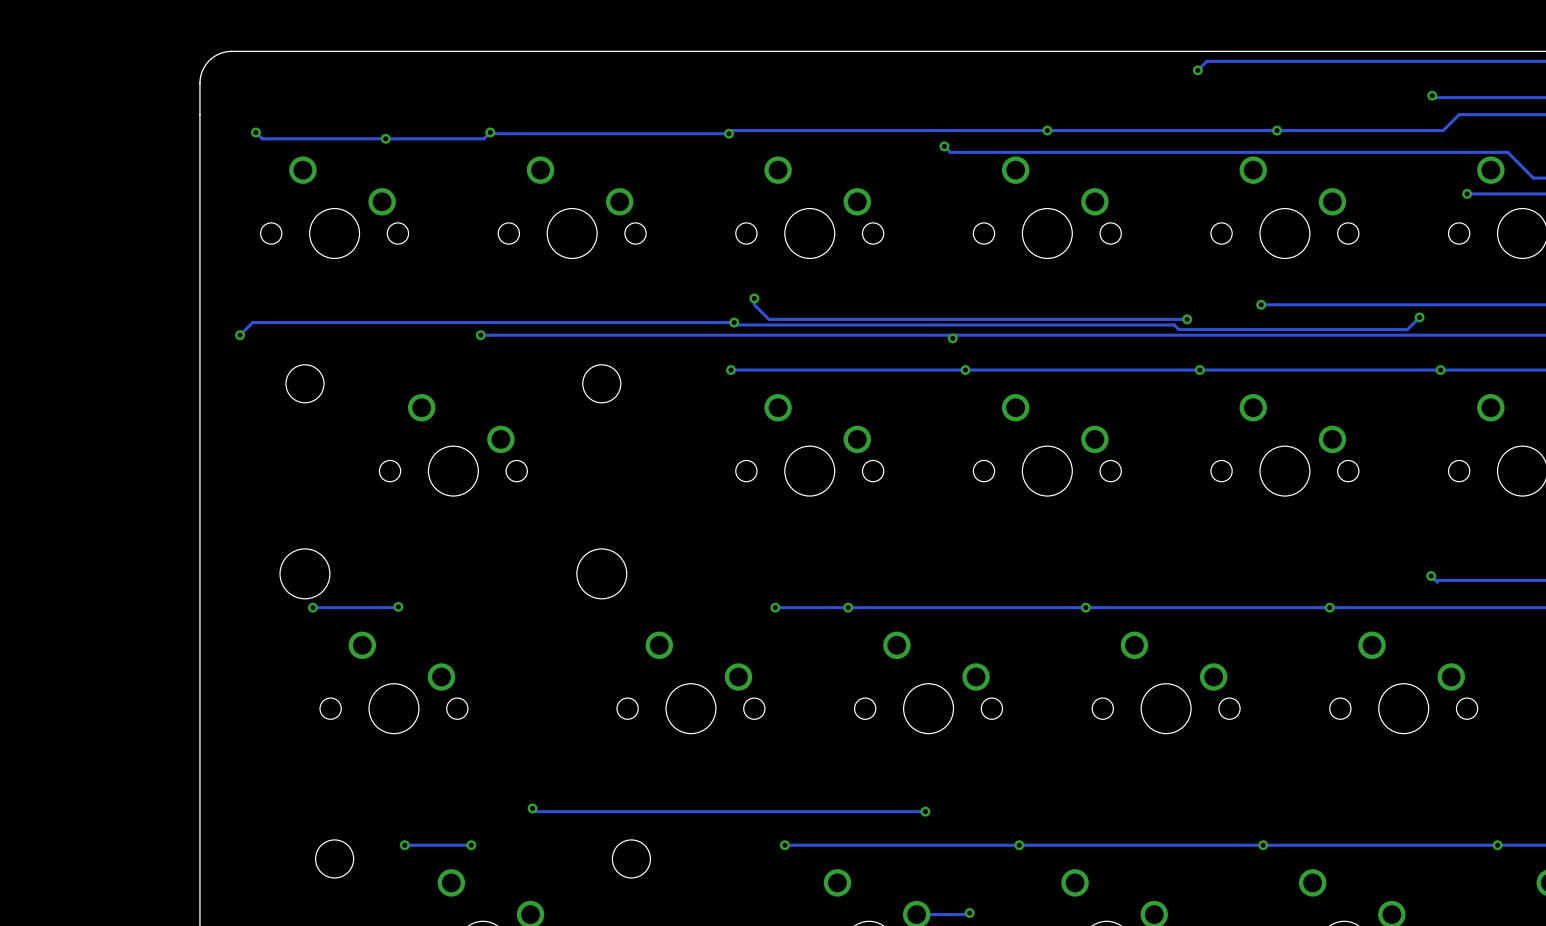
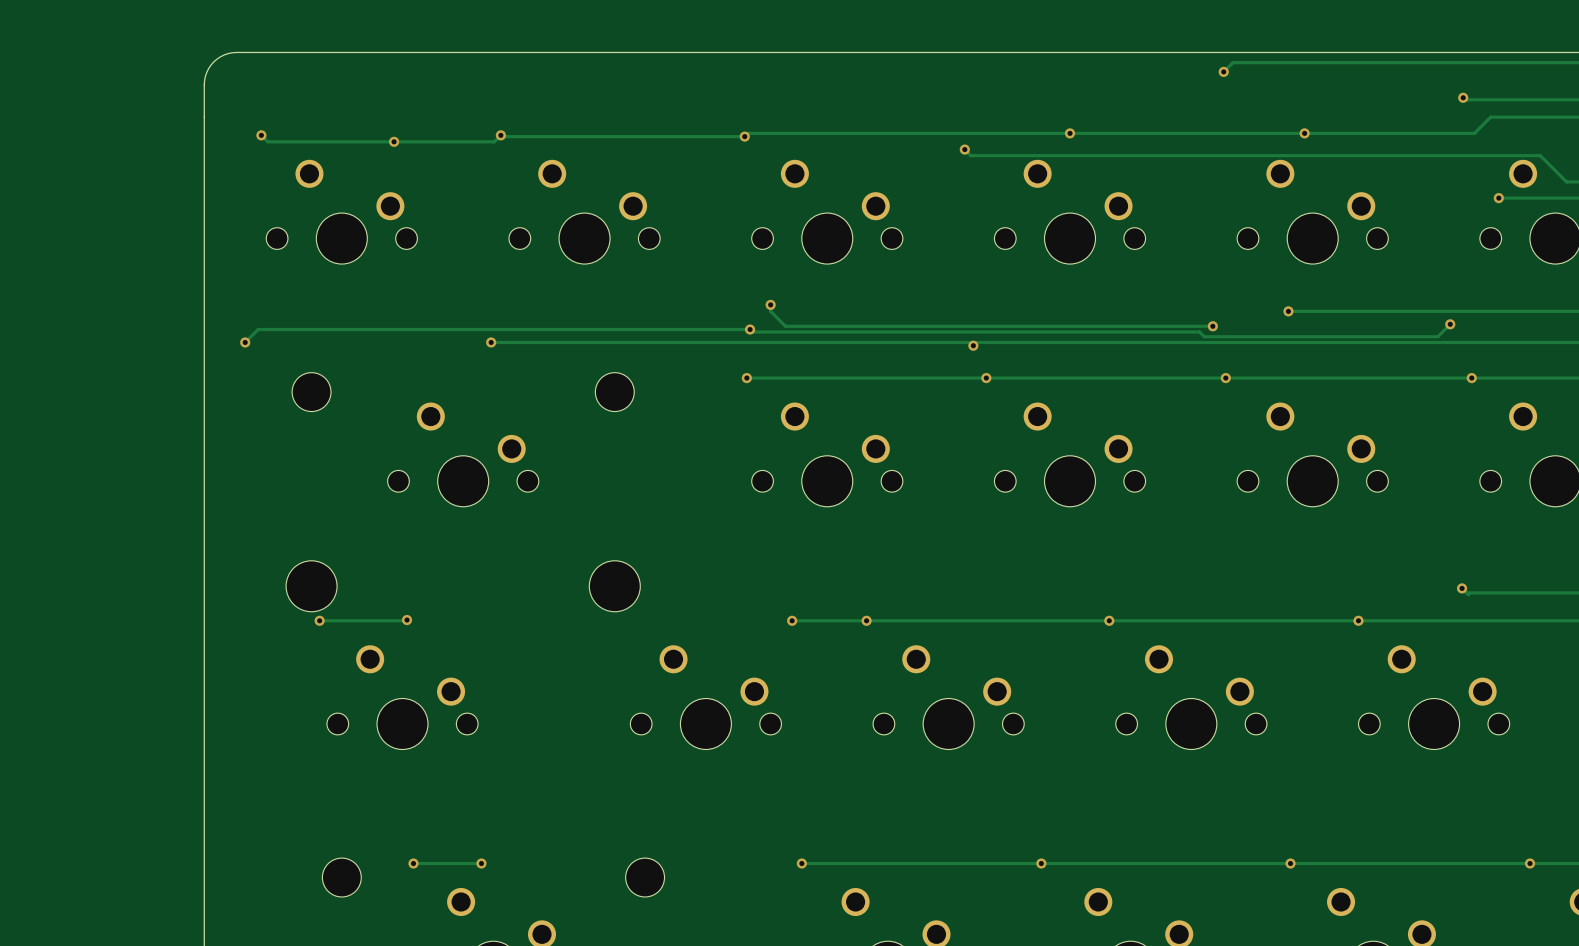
track: (532, 808) (535, 811) (925, 811) -> none
via: (532, 808) -> none
via: (925, 811) -> none
track: (969, 912) (968, 914) (916, 914) -> none
via: (969, 912) -> none

